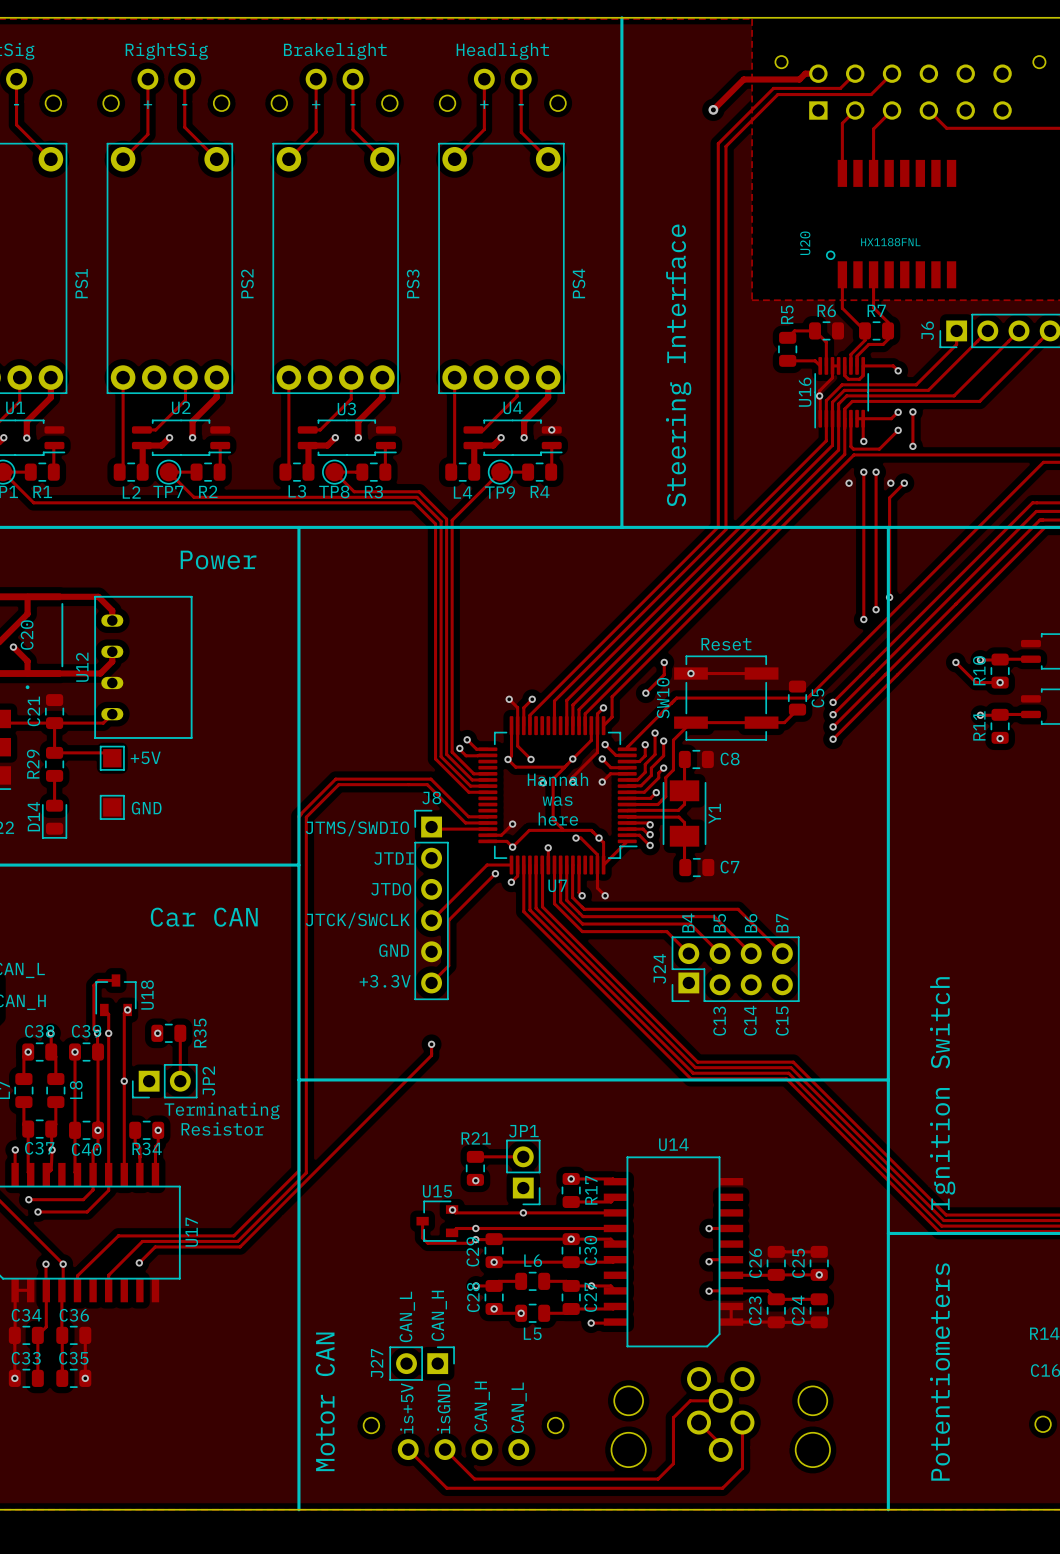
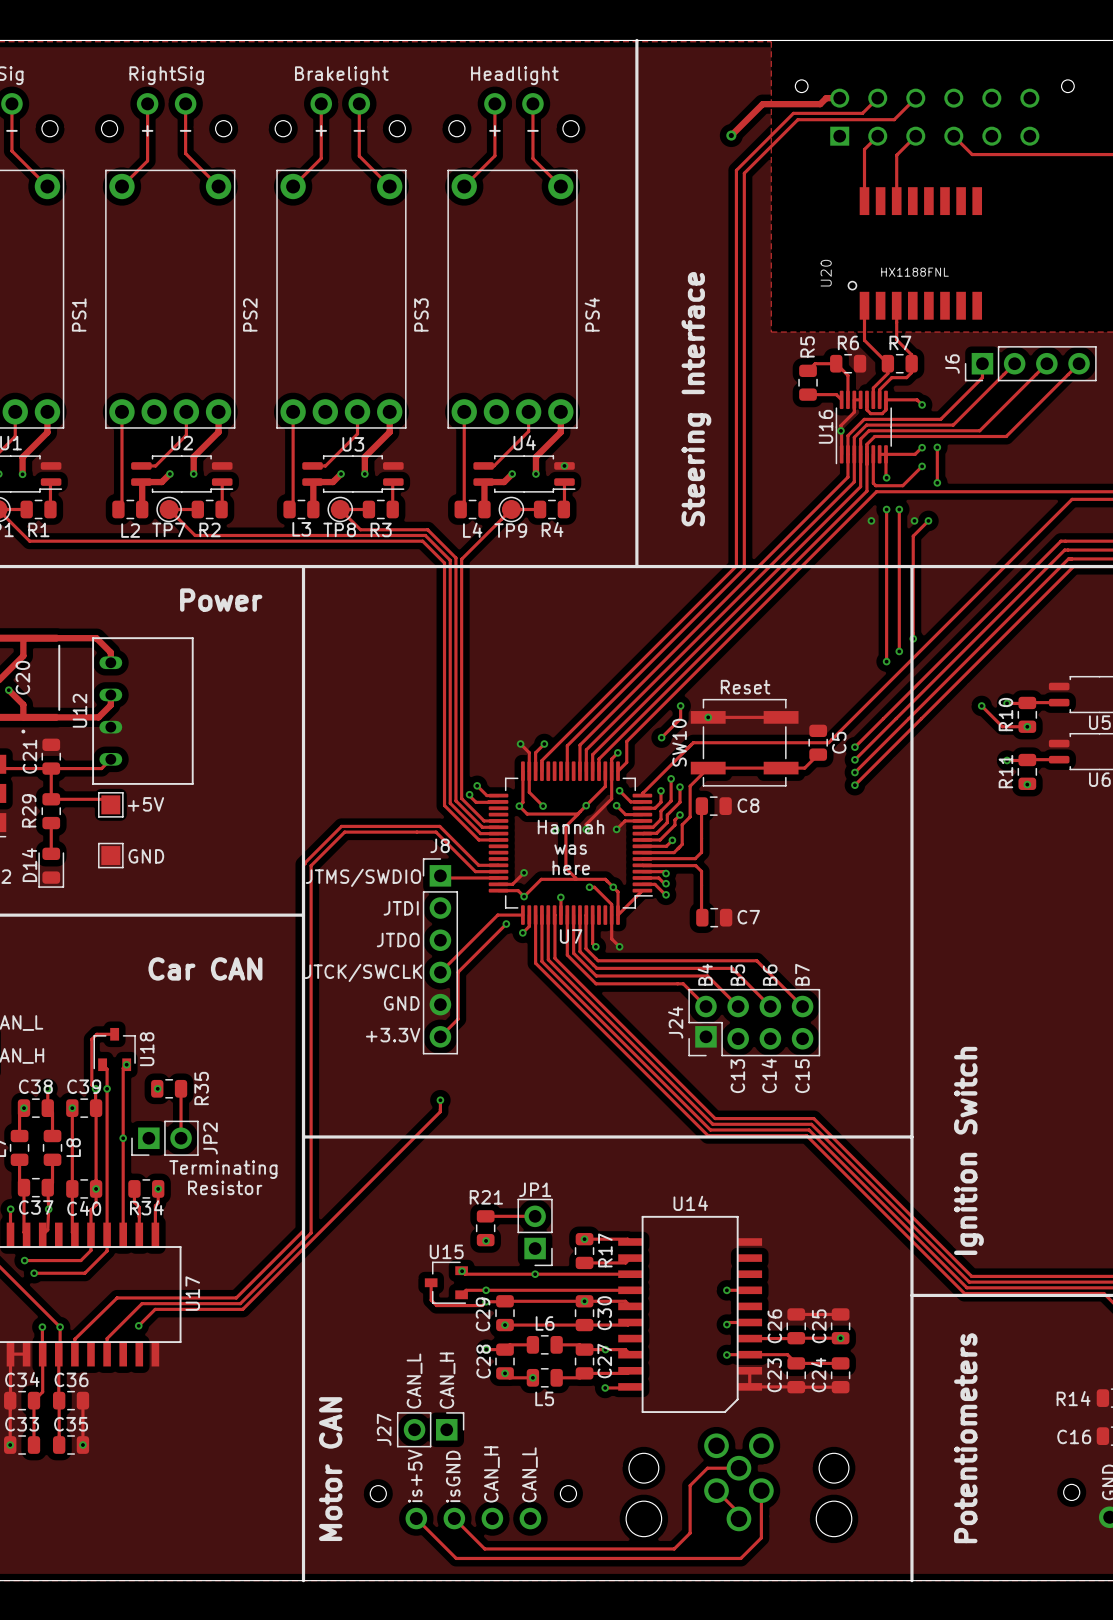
Y1: (684, 813) -> none

